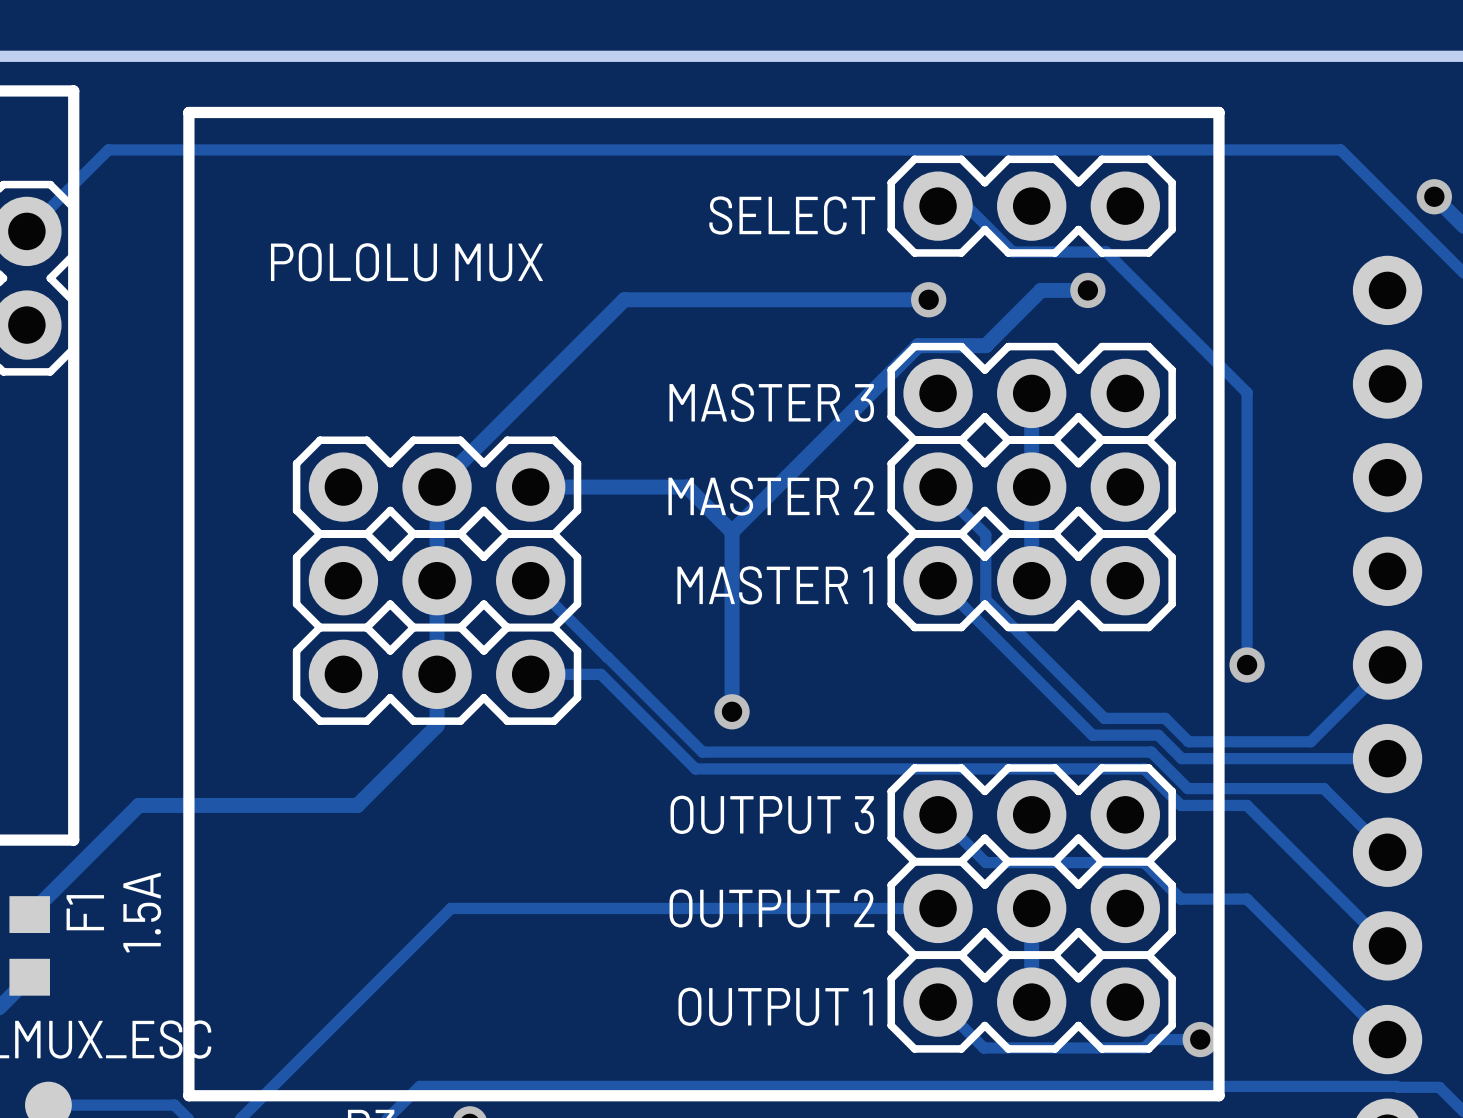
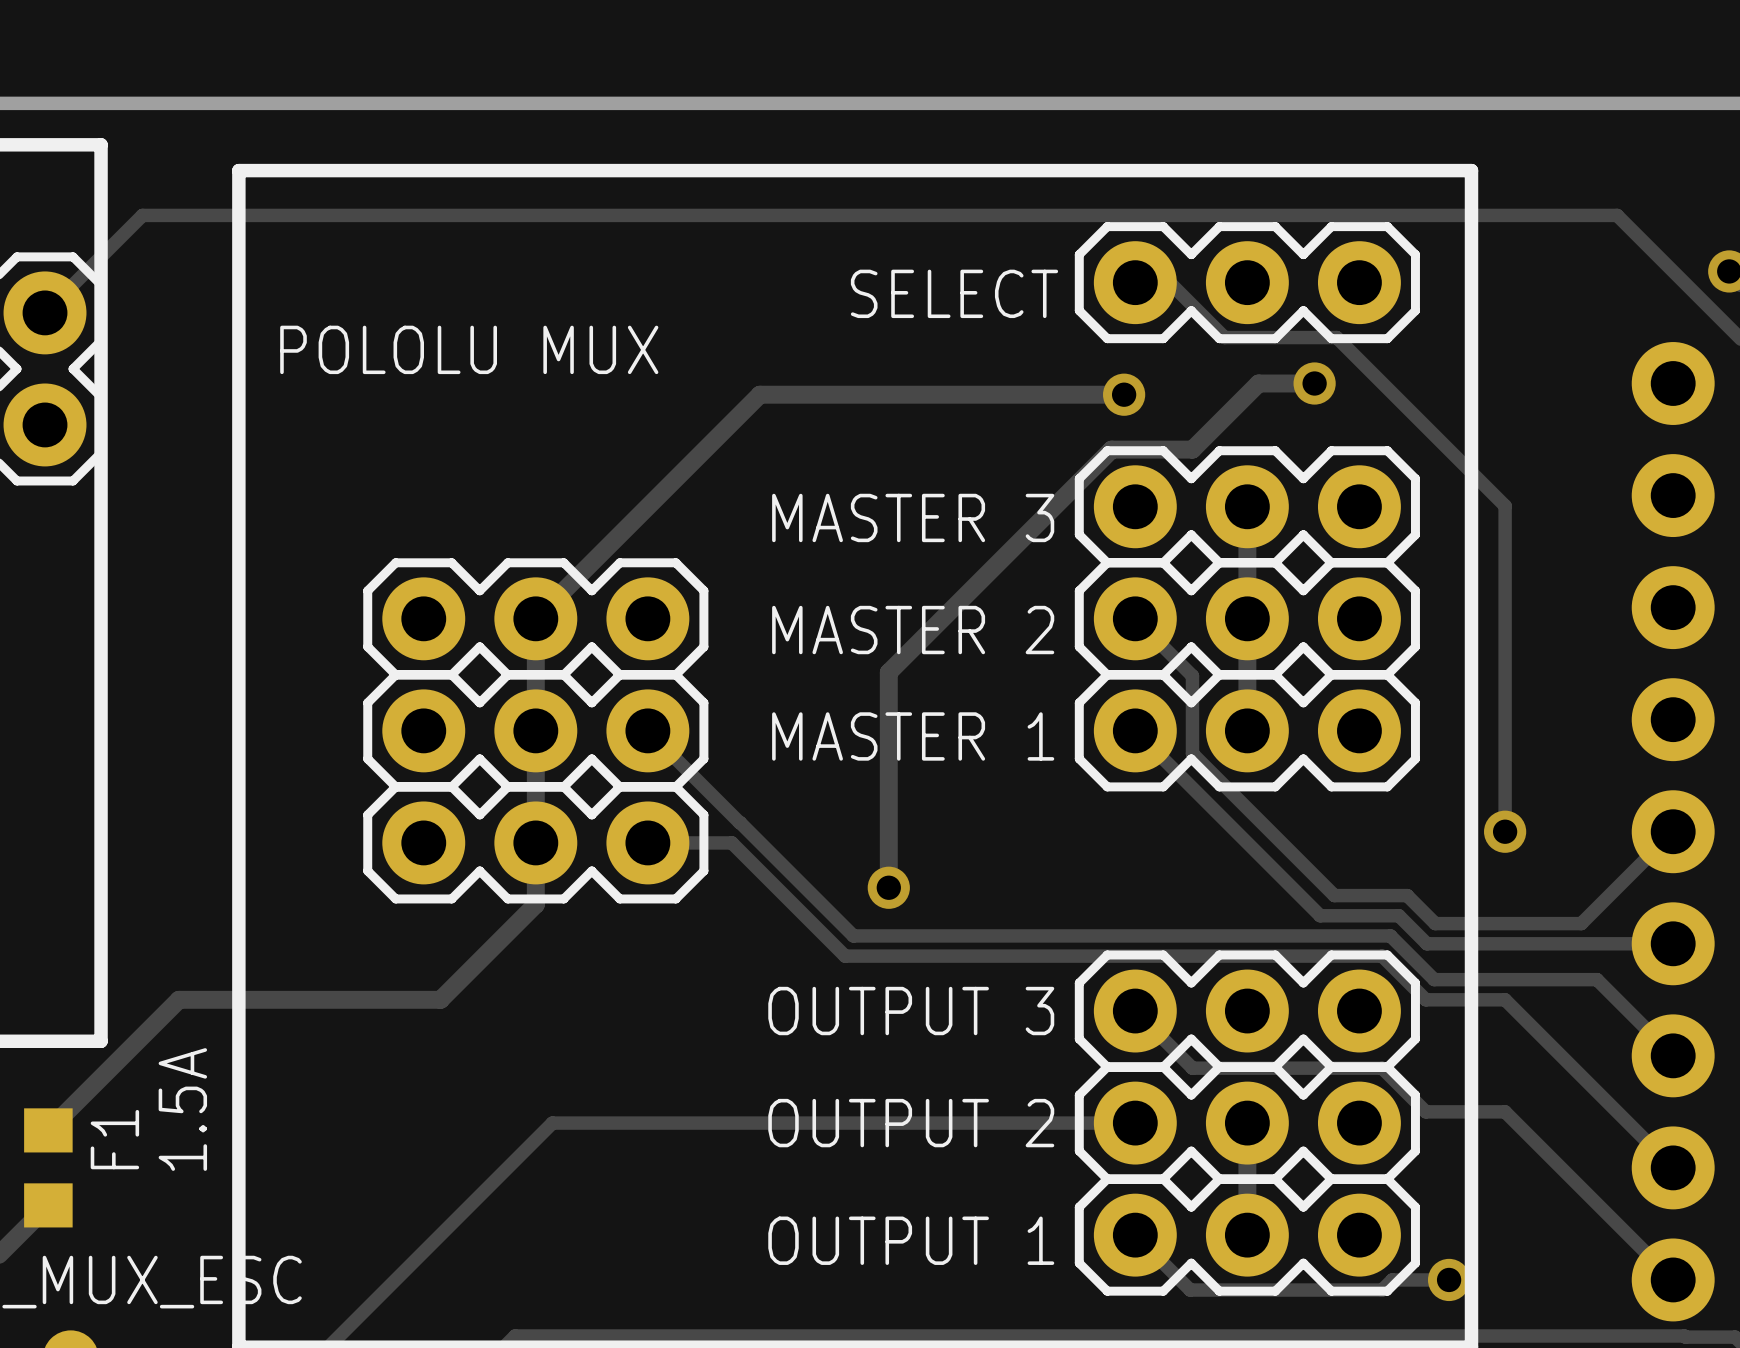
track: (530, 487) (687, 487) (732, 531) -> none

